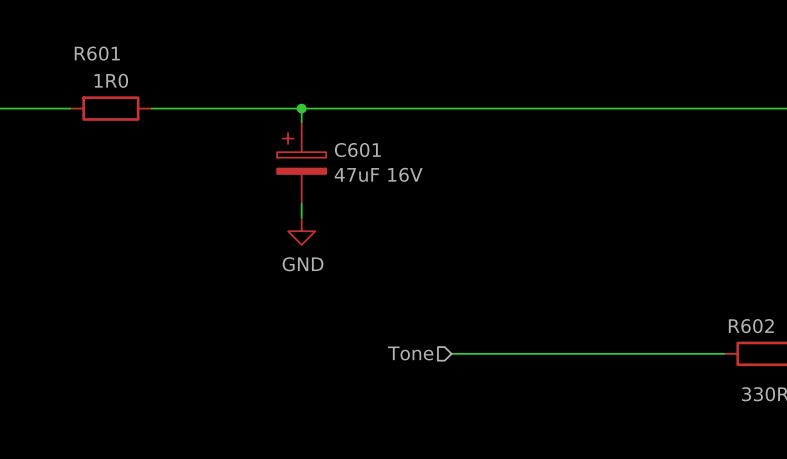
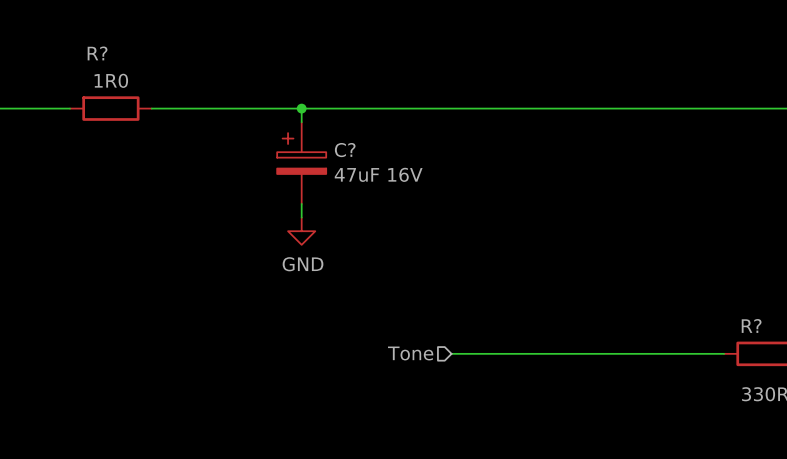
R601 name: R601 (97, 53) -> R? (97, 53)
C601 name: C601 (357, 150) -> C? (345, 150)
R602 name: R602 (751, 326) -> R? (751, 325)

